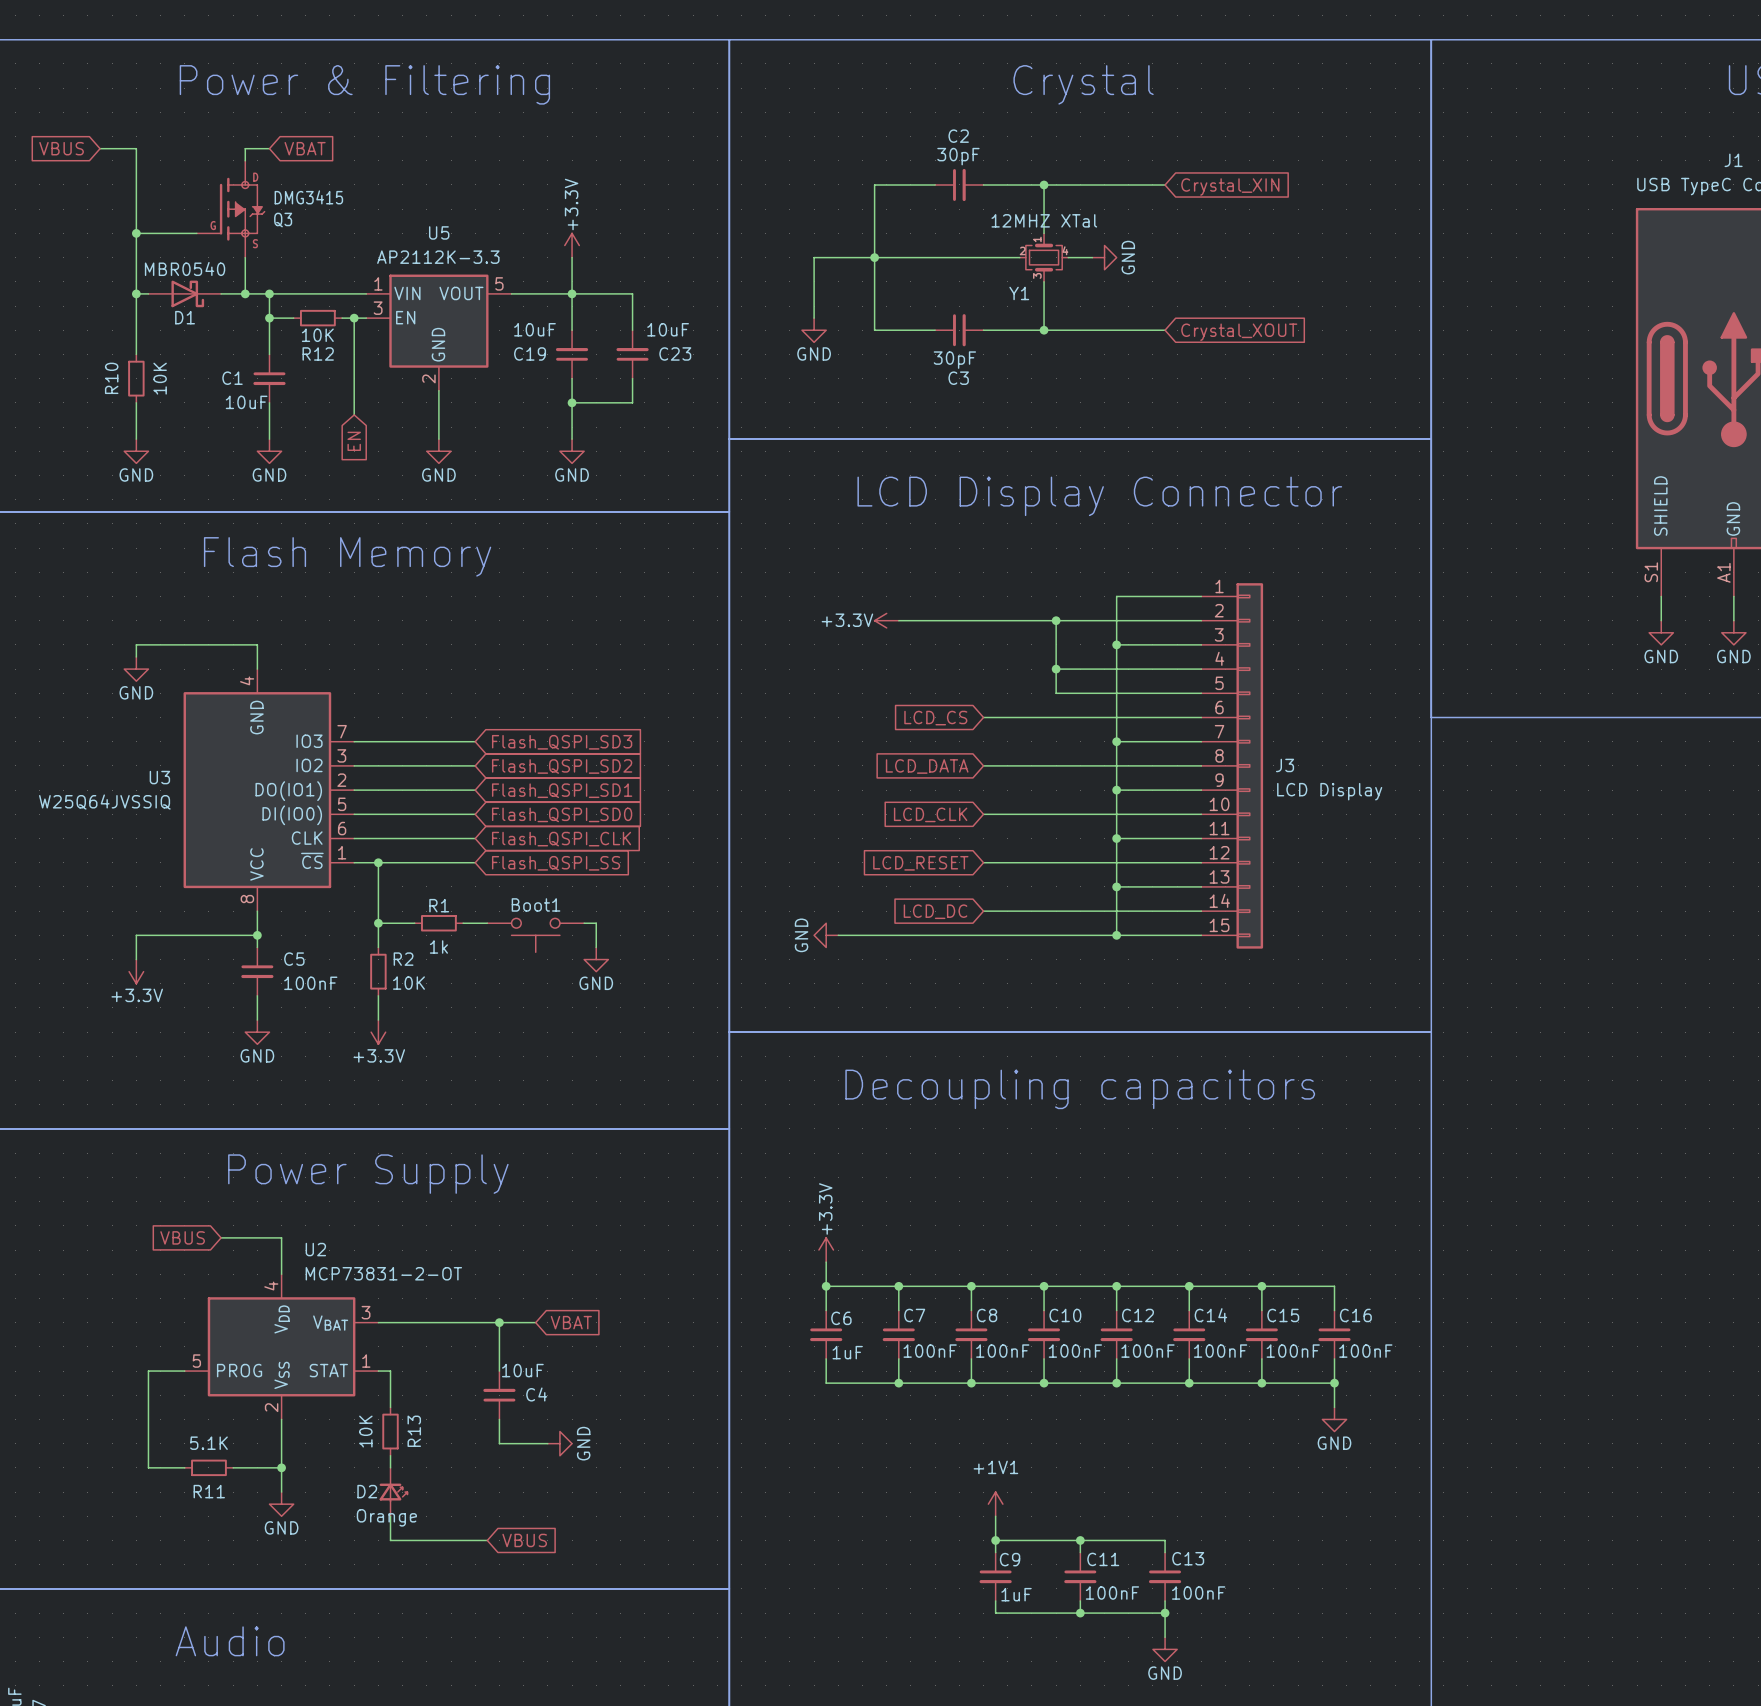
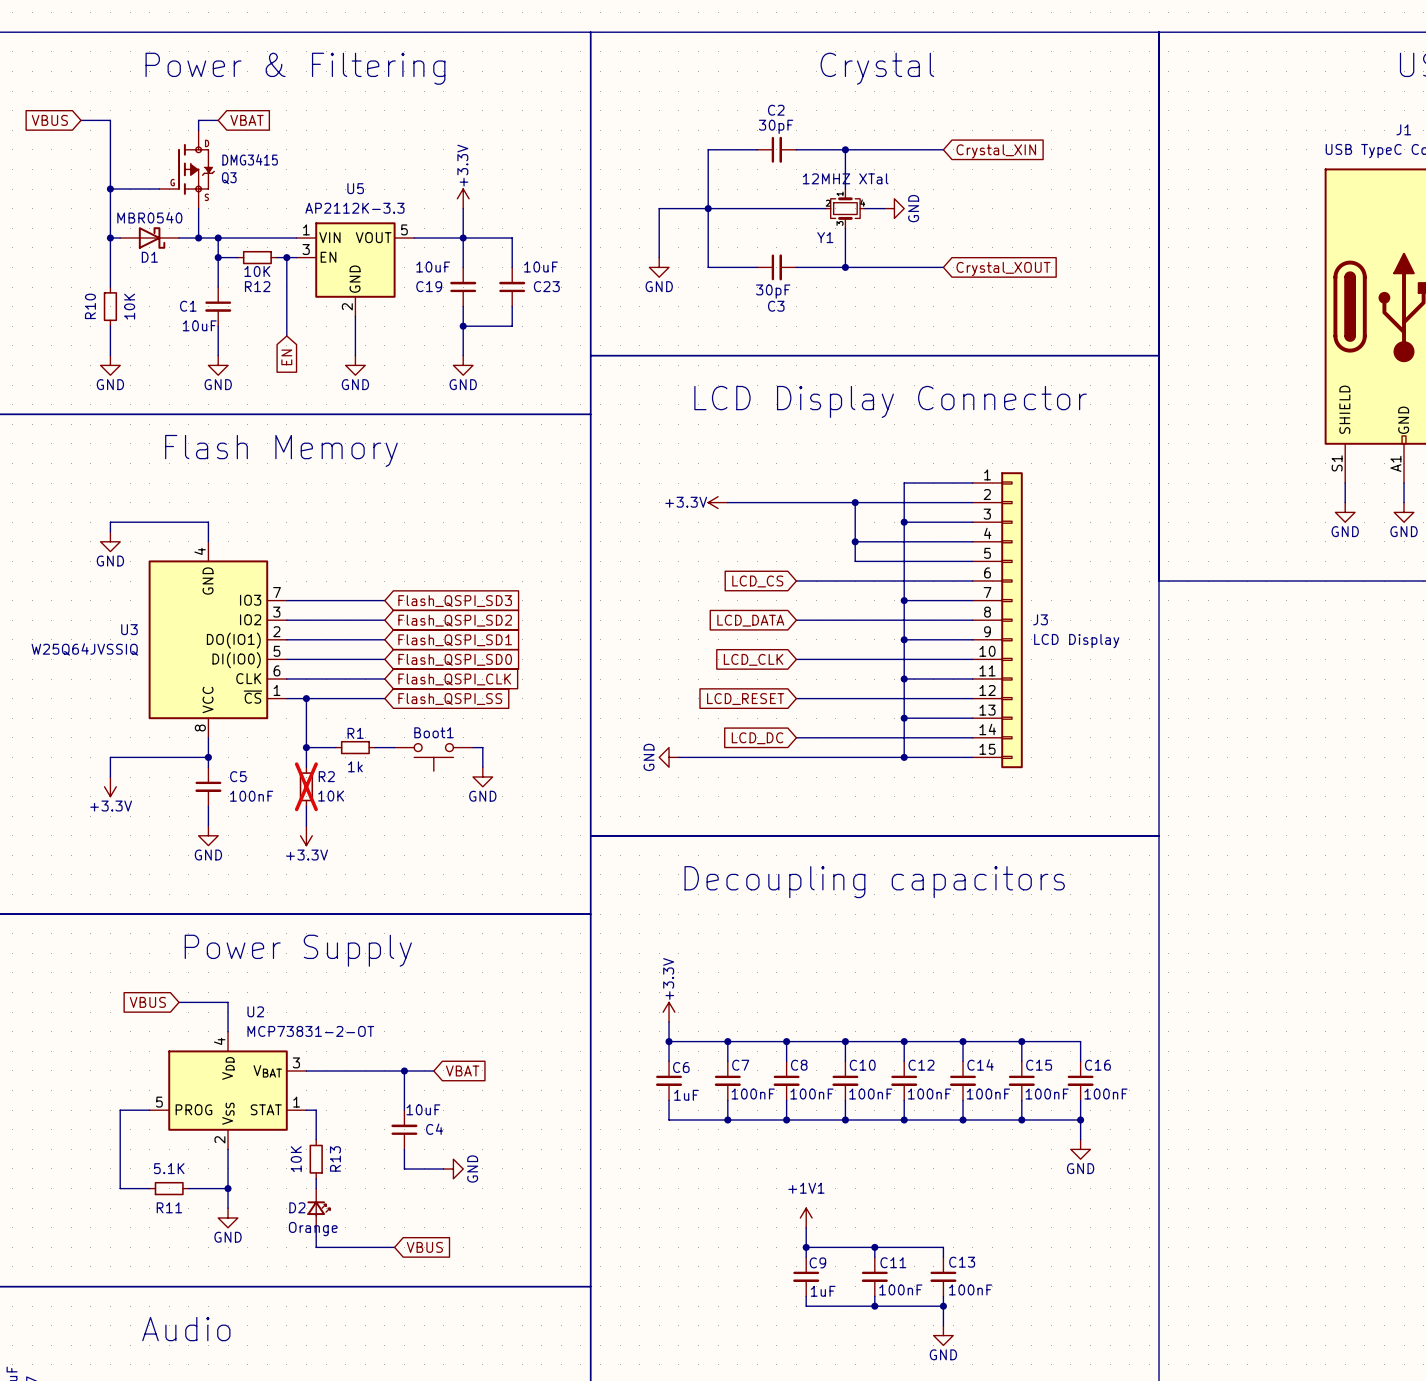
R2 do-not-place cross: none -> (306, 786)

